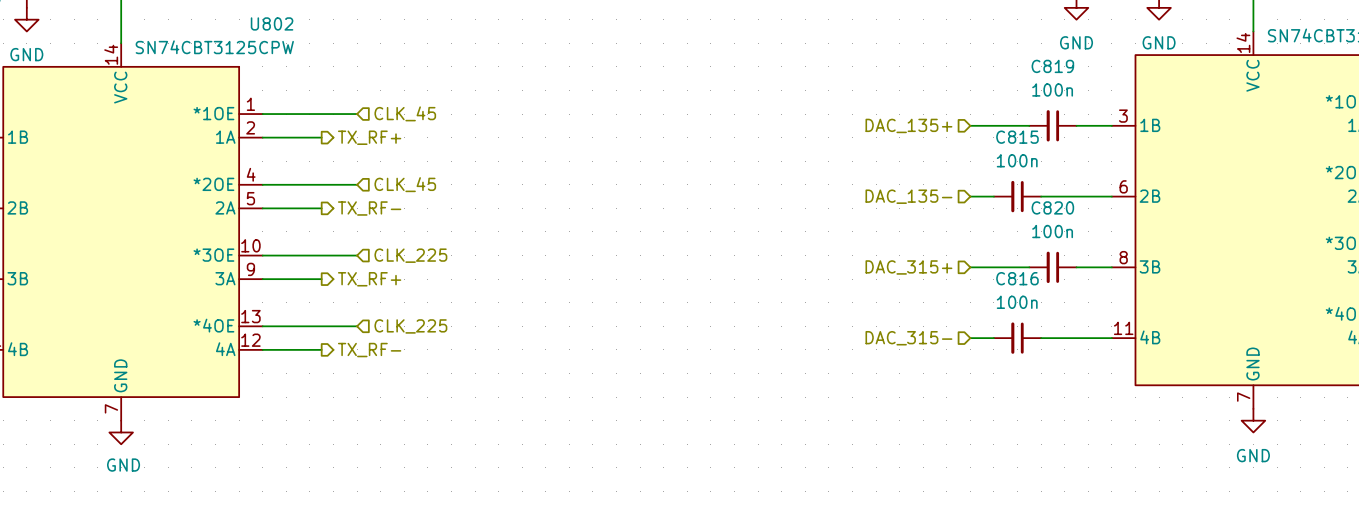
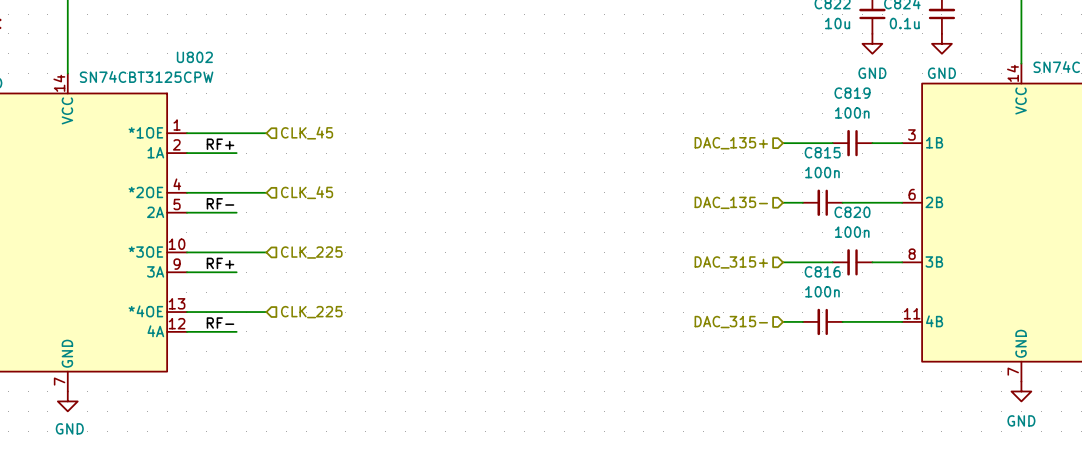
label: none -> RF+ (220, 144)
hierarchical label: TX_RF+ (369, 137) -> none
label: none -> RF- (220, 203)
hierarchical label: TX_RF- (369, 208) -> none
label: none -> RF+ (220, 263)
hierarchical label: TX_RF+ (369, 279) -> none
label: none -> RF- (220, 323)
hierarchical label: TX_RF- (369, 350) -> none

